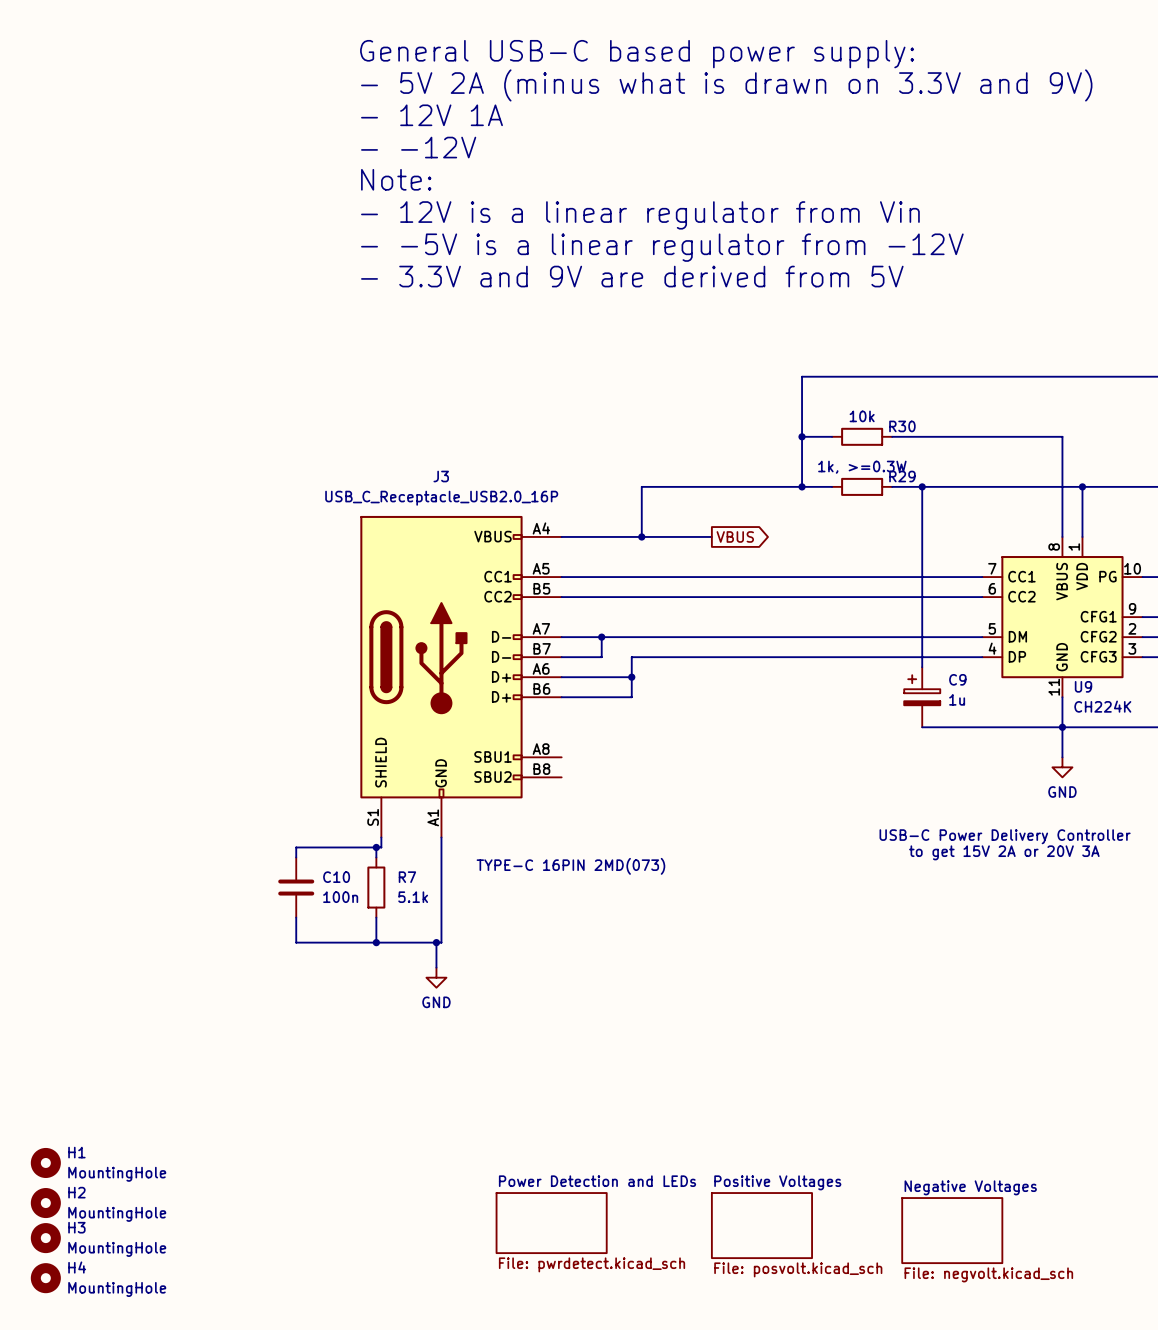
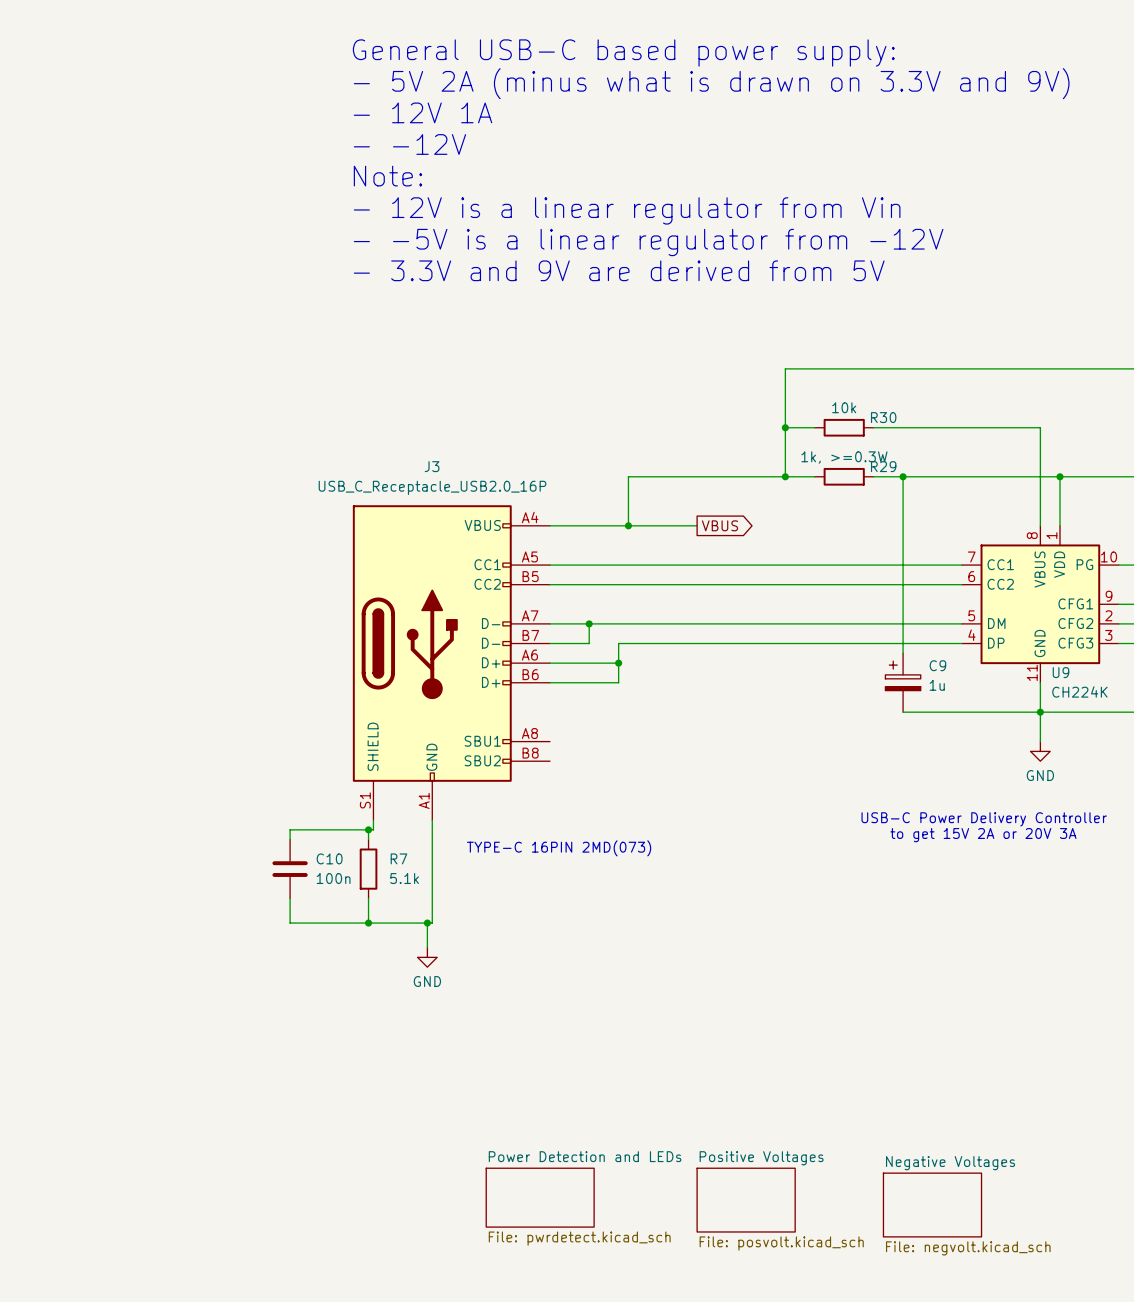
H1: MountingHole (45, 1162) -> none
H2: MountingHole (45, 1203) -> none
H3: MountingHole (45, 1238) -> none
H4: MountingHole (45, 1278) -> none

